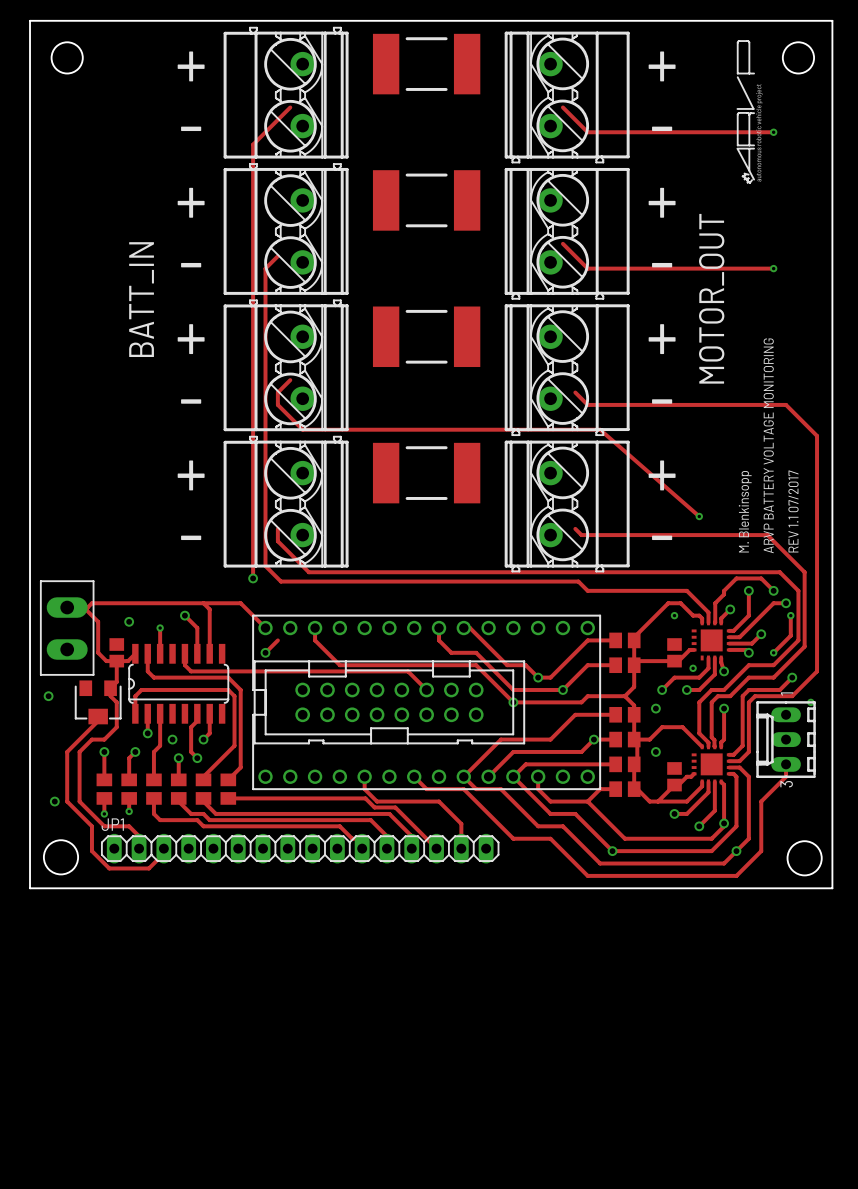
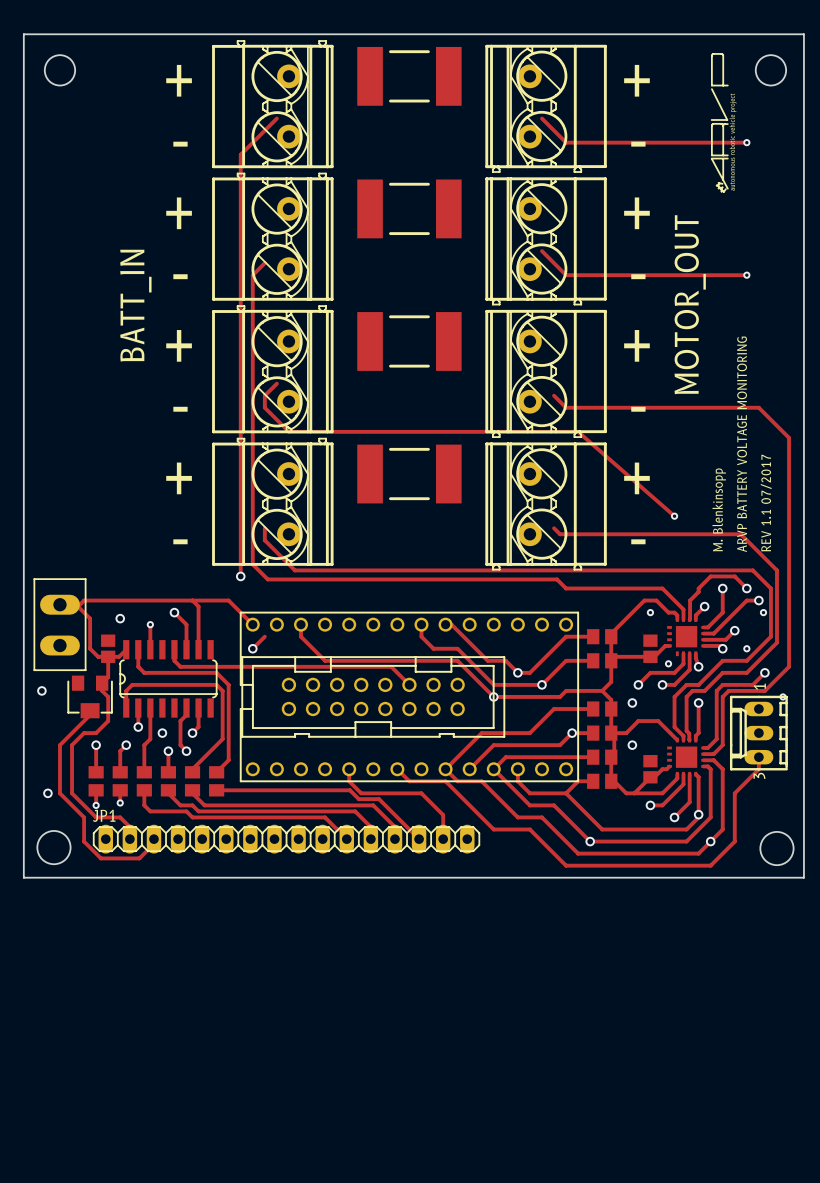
track: (790, 615) (790, 635) (773, 652) -> none

